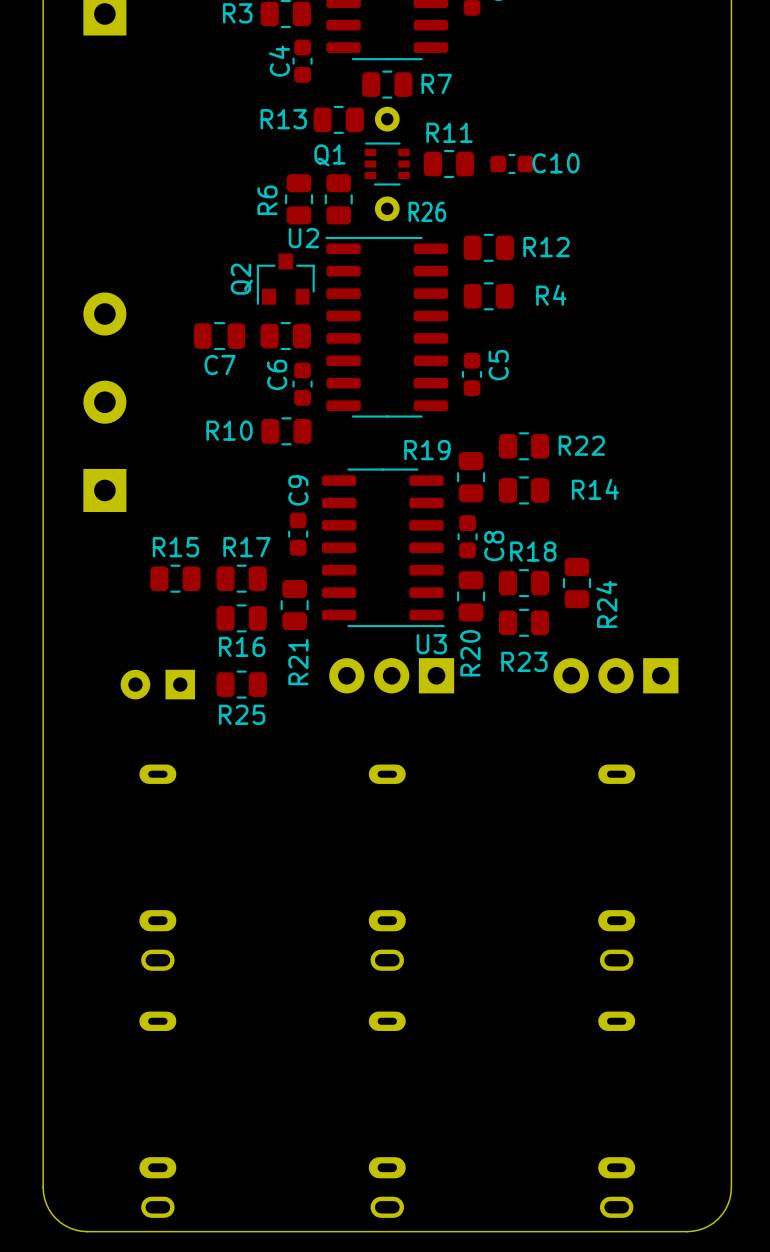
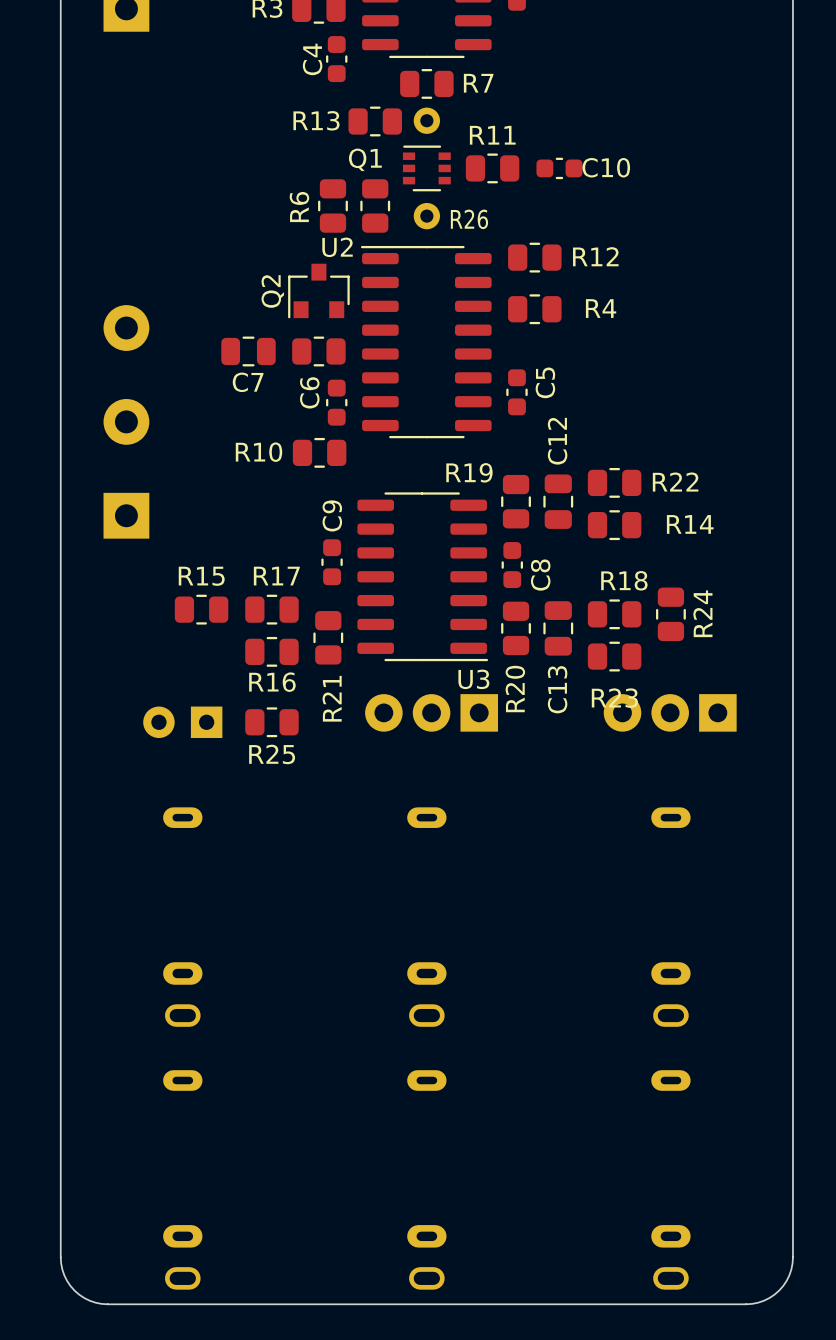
R22 position: (524, 446) -> (614, 482)
C12: none -> (558, 501)
R14 position: (524, 490) -> (614, 525)
R18 position: (524, 583) -> (614, 614)
R24 position: (576, 583) -> (670, 614)
C13: none -> (558, 628)
R24 name position: R24 (606, 604) -> R24 (702, 613)
R23 position: (524, 622) -> (614, 656)

